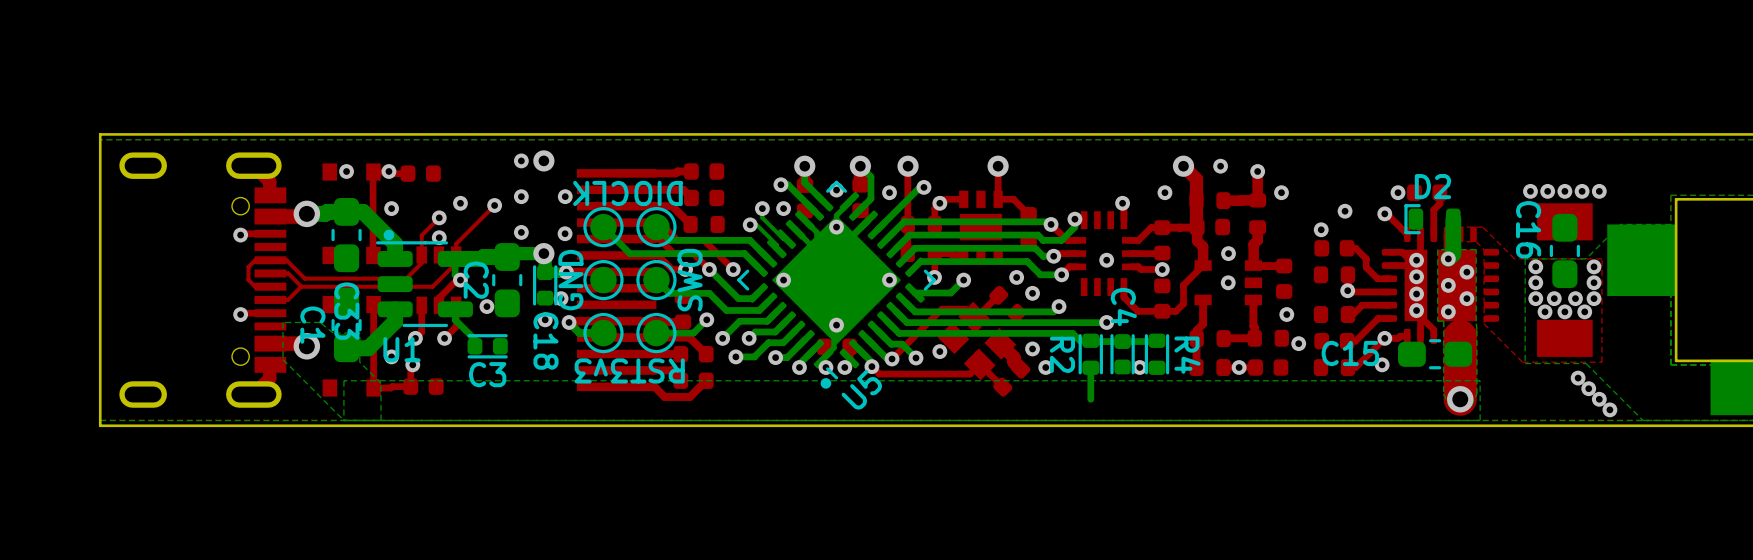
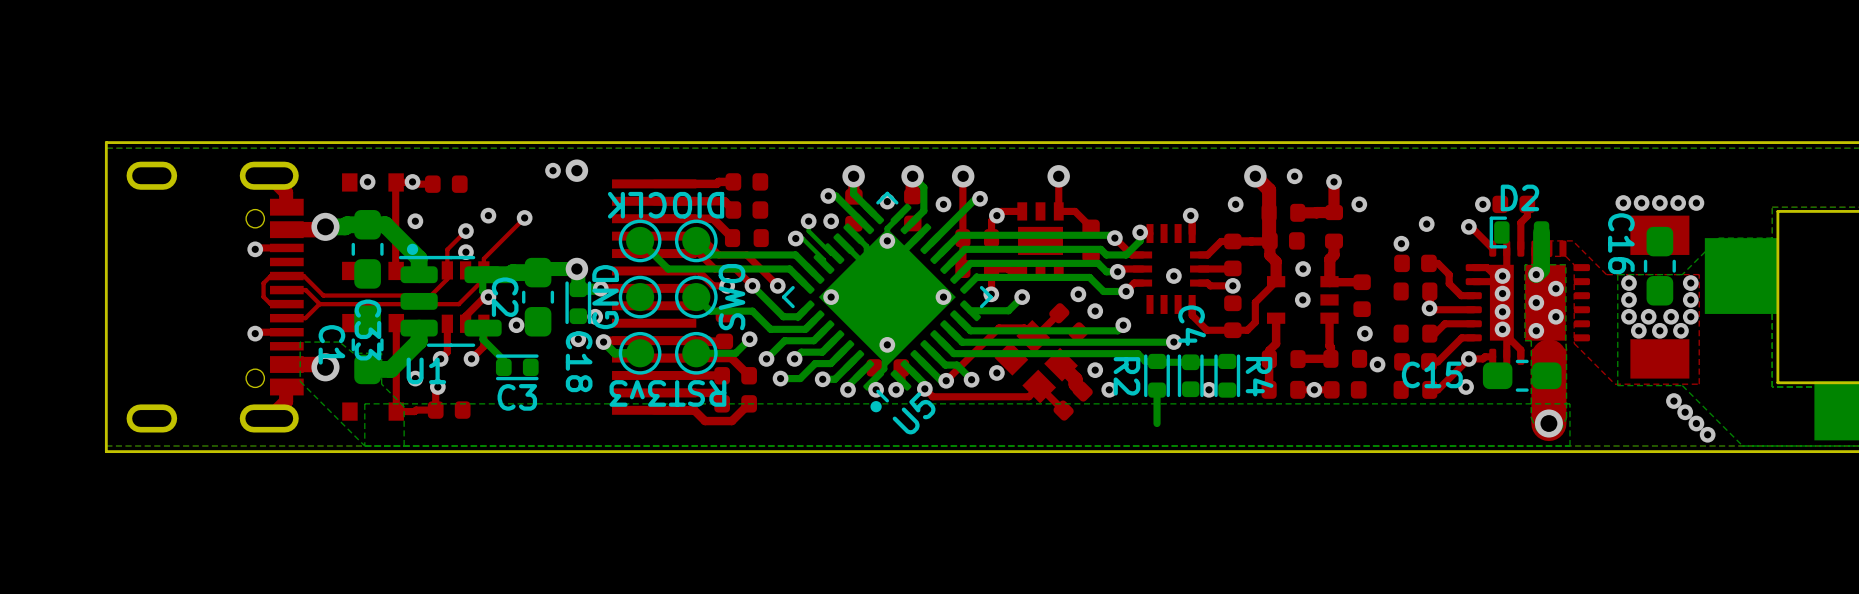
via: (521, 196) -> none
via: (565, 196) -> none
via: (521, 232) -> none
via: (565, 233) -> none

